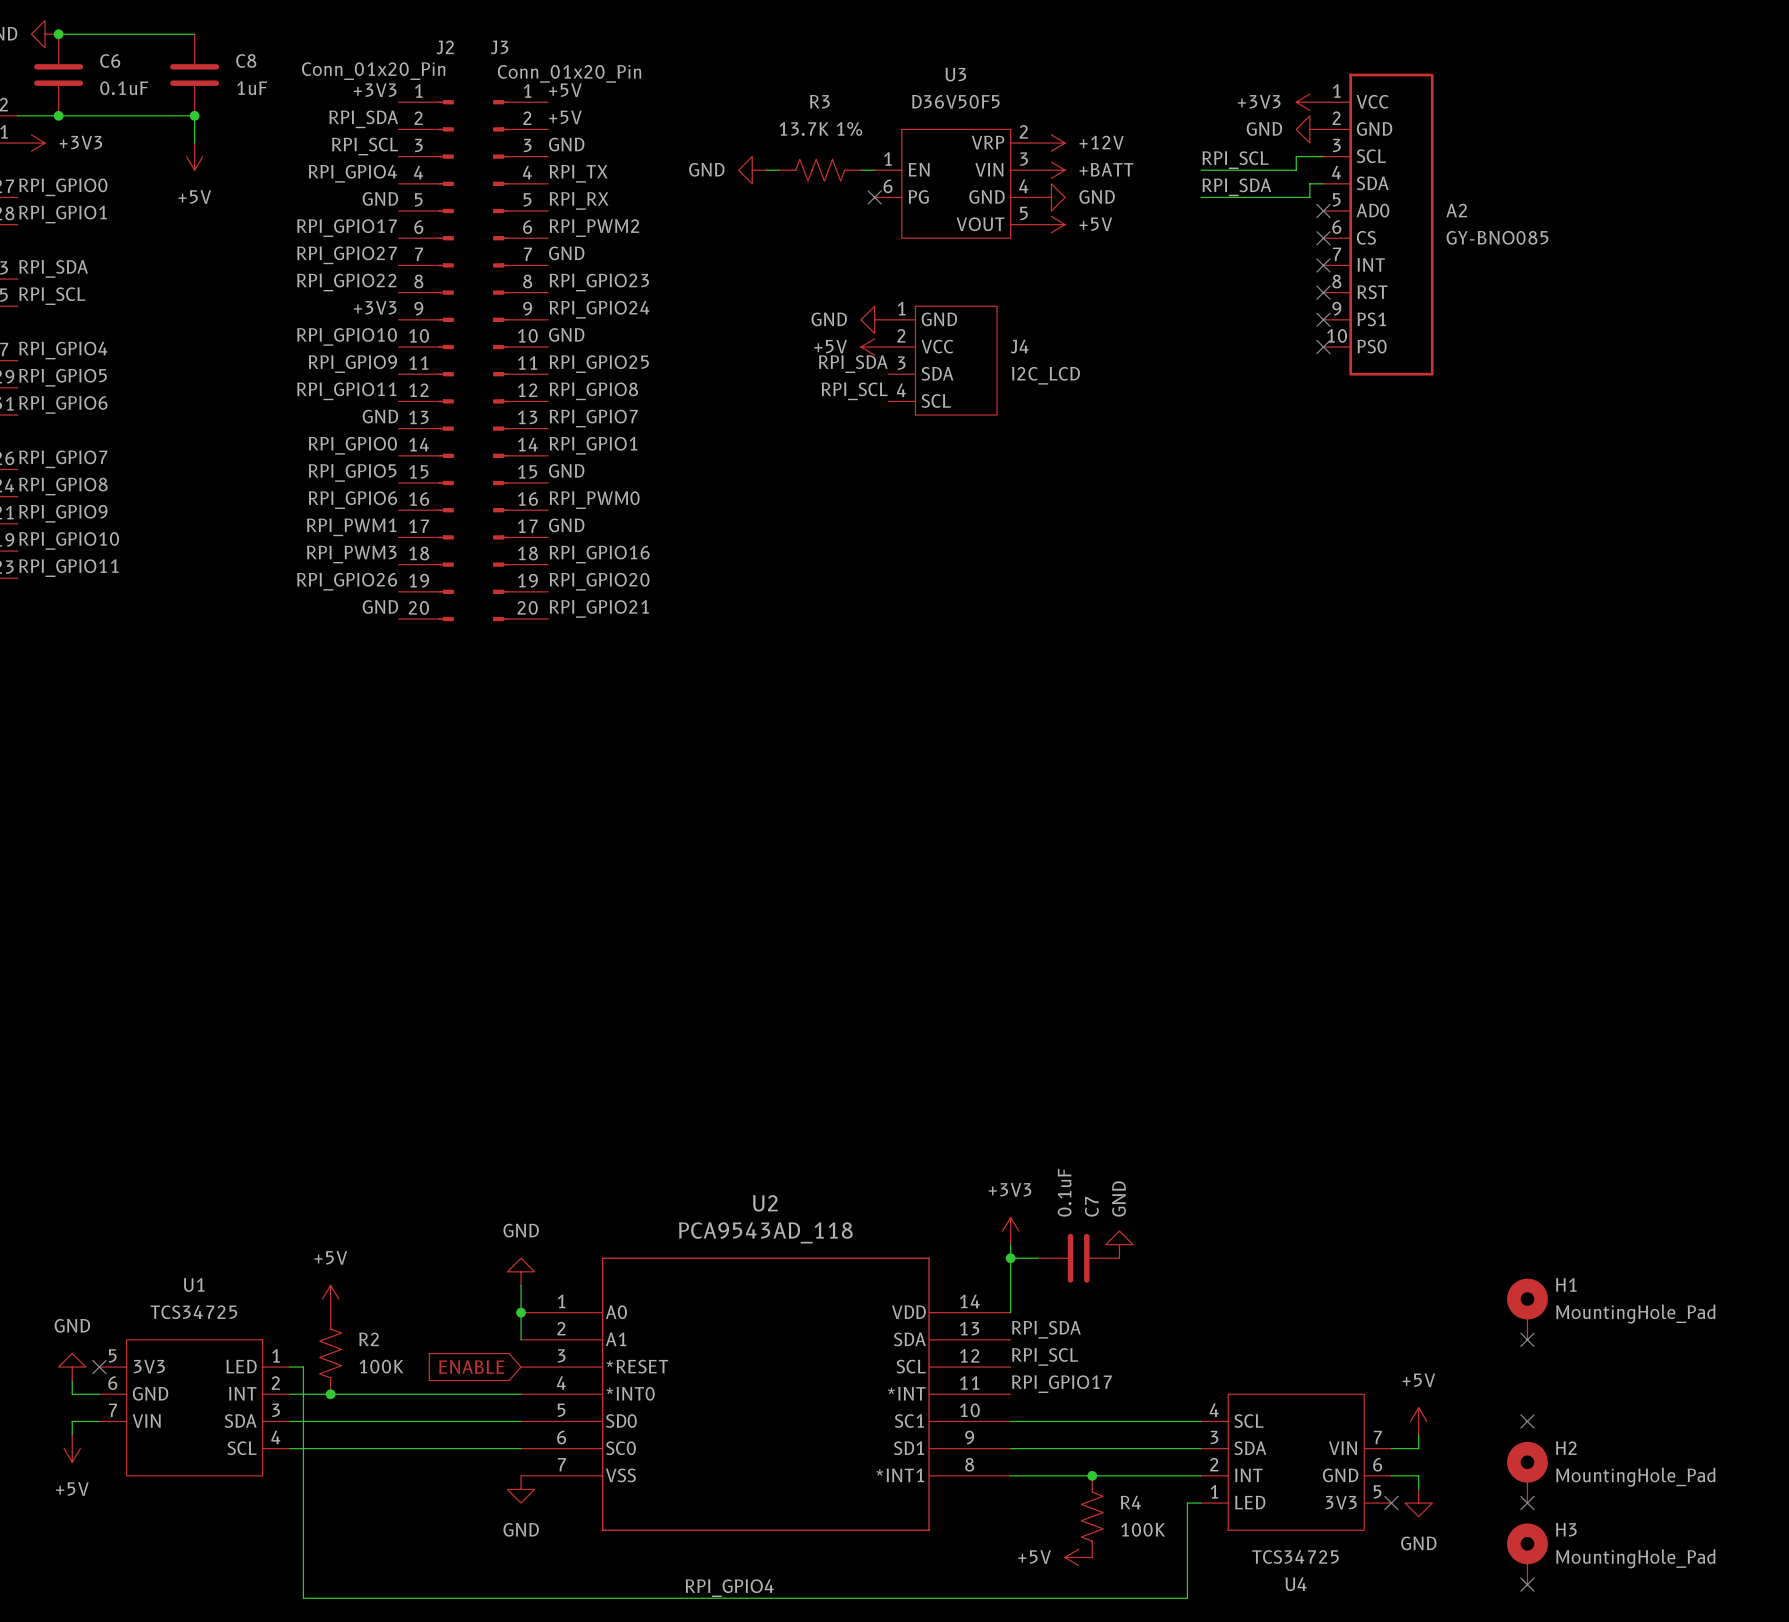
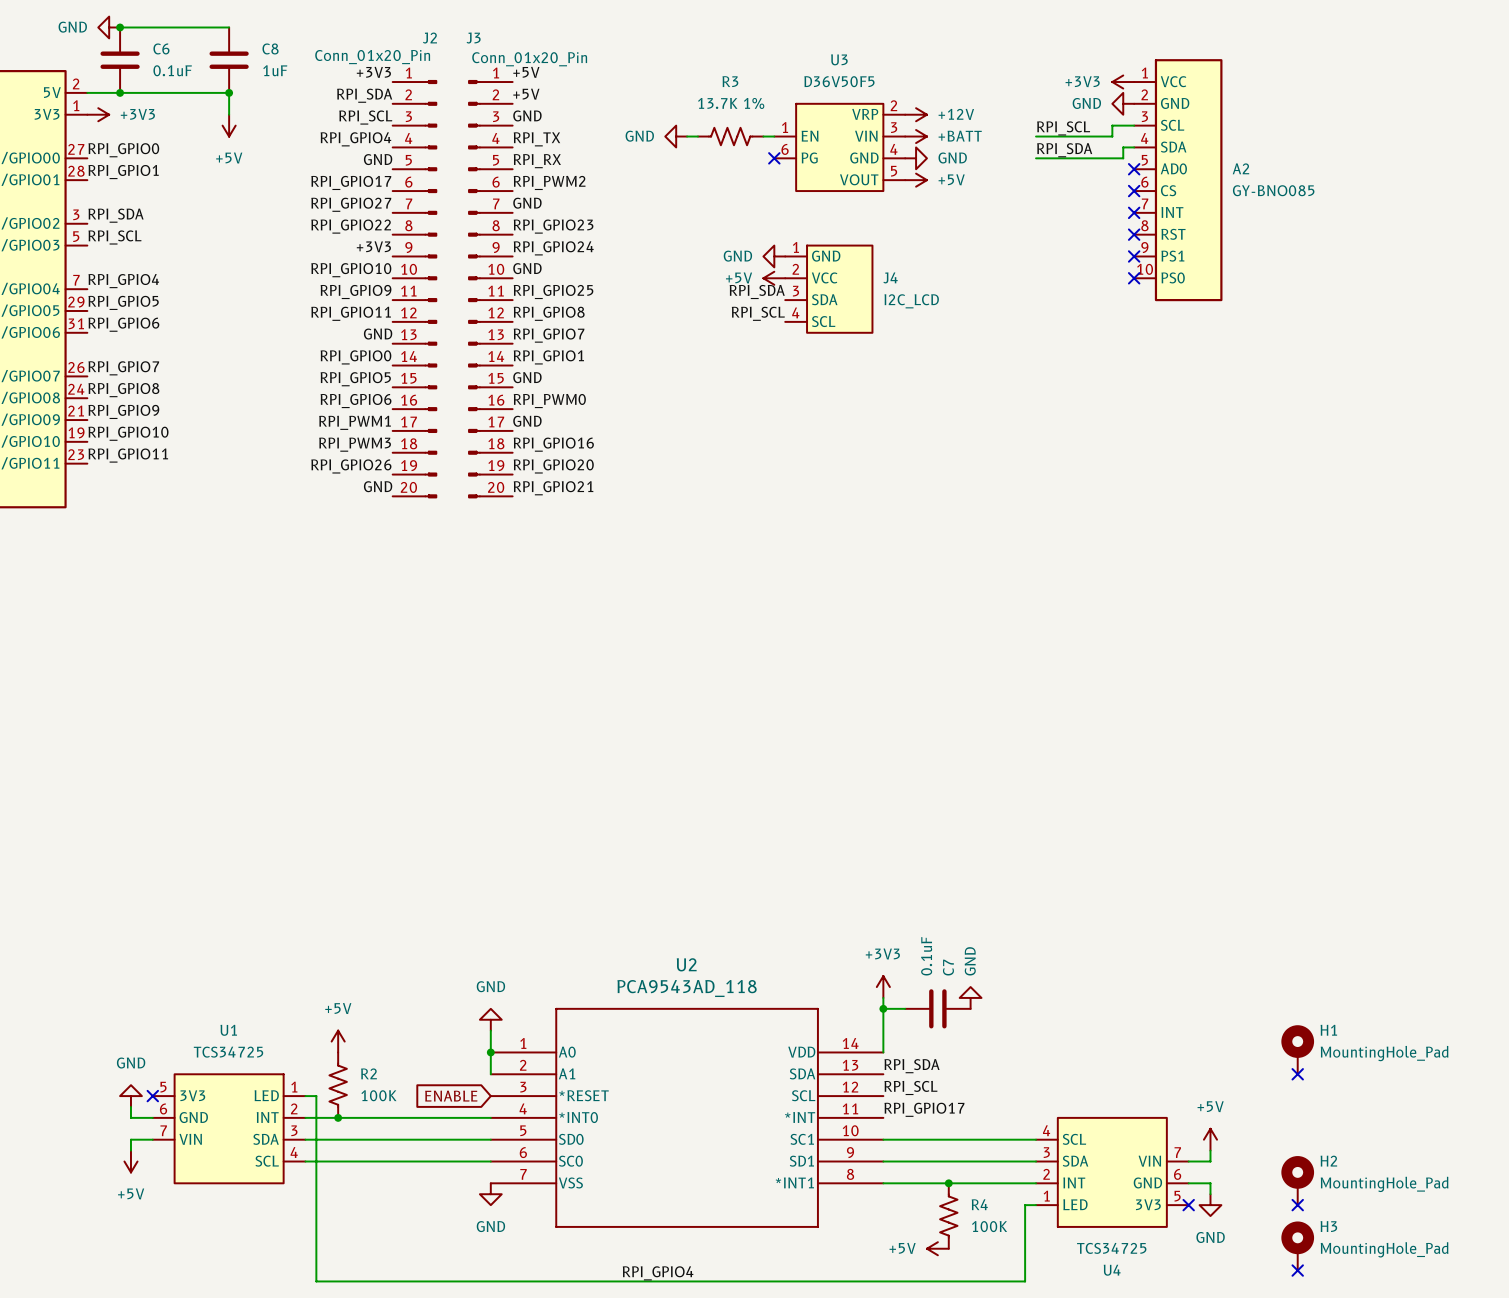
no-connect mark: (1527, 1421) -> none

